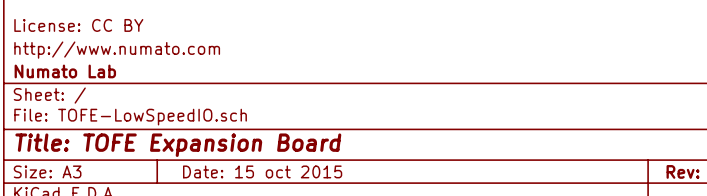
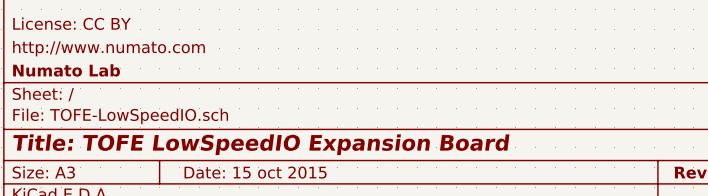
title block: Title: TOFE Expansion Board (178, 145) -> Title: TOFE LowSpeedIO Expansion Board (261, 144)

